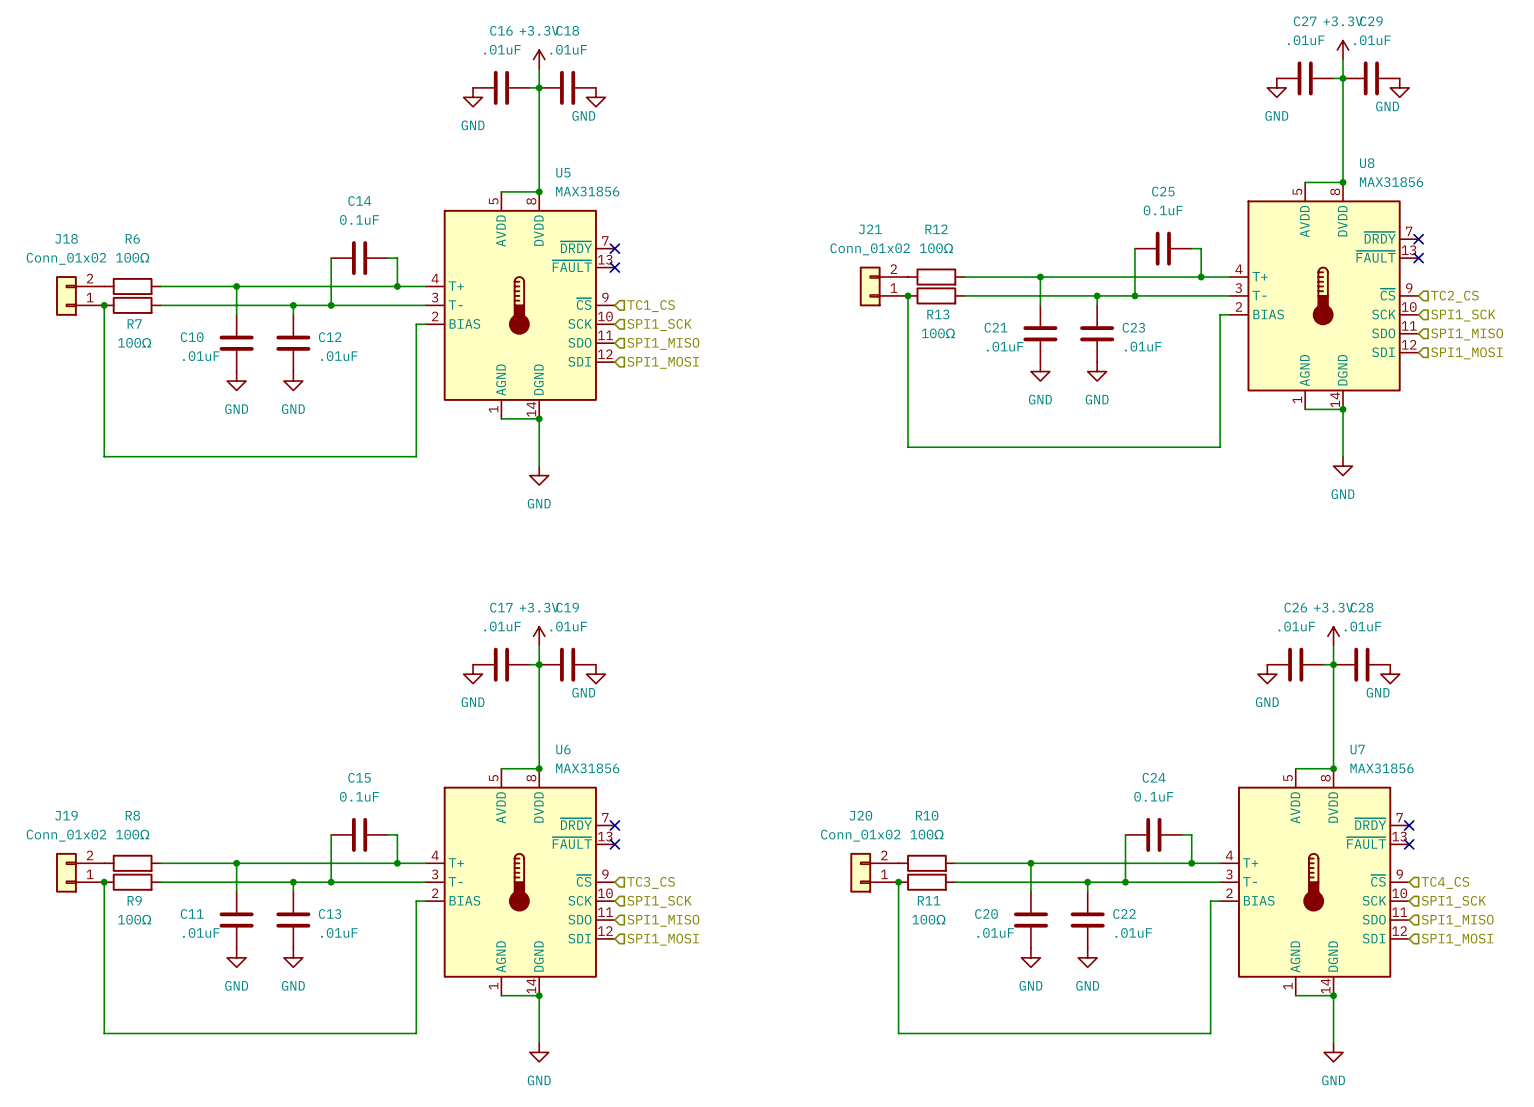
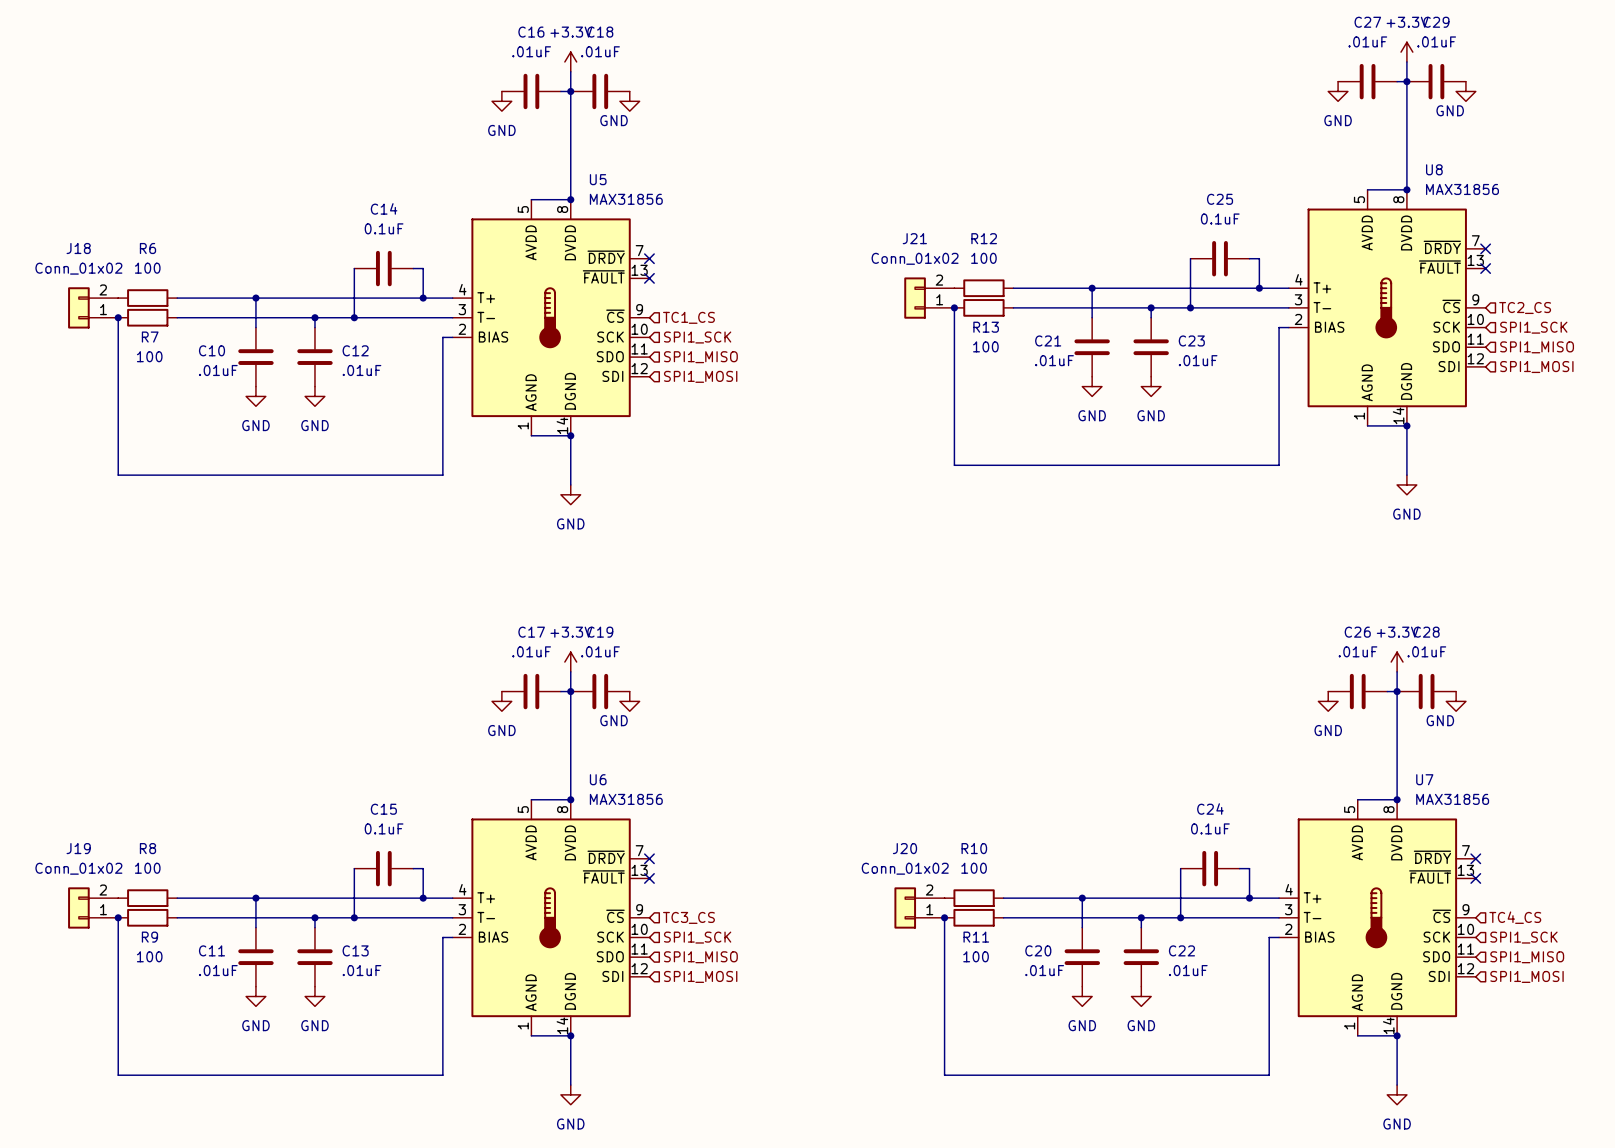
R12 value: 100Ω (936, 248) -> 100 (983, 258)
R6 value: 100Ω (132, 257) -> 100 (147, 268)
R13 value: 100Ω (938, 333) -> 100 (985, 346)
R7 value: 100Ω (134, 342) -> 100 (149, 356)
R8 value: 100Ω (132, 834) -> 100 (147, 868)
R10 value: 100Ω (927, 834) -> 100 (974, 868)
R9 value: 100Ω (134, 919) -> 100 (149, 956)
R11 value: 100Ω (928, 919) -> 100 (976, 956)

